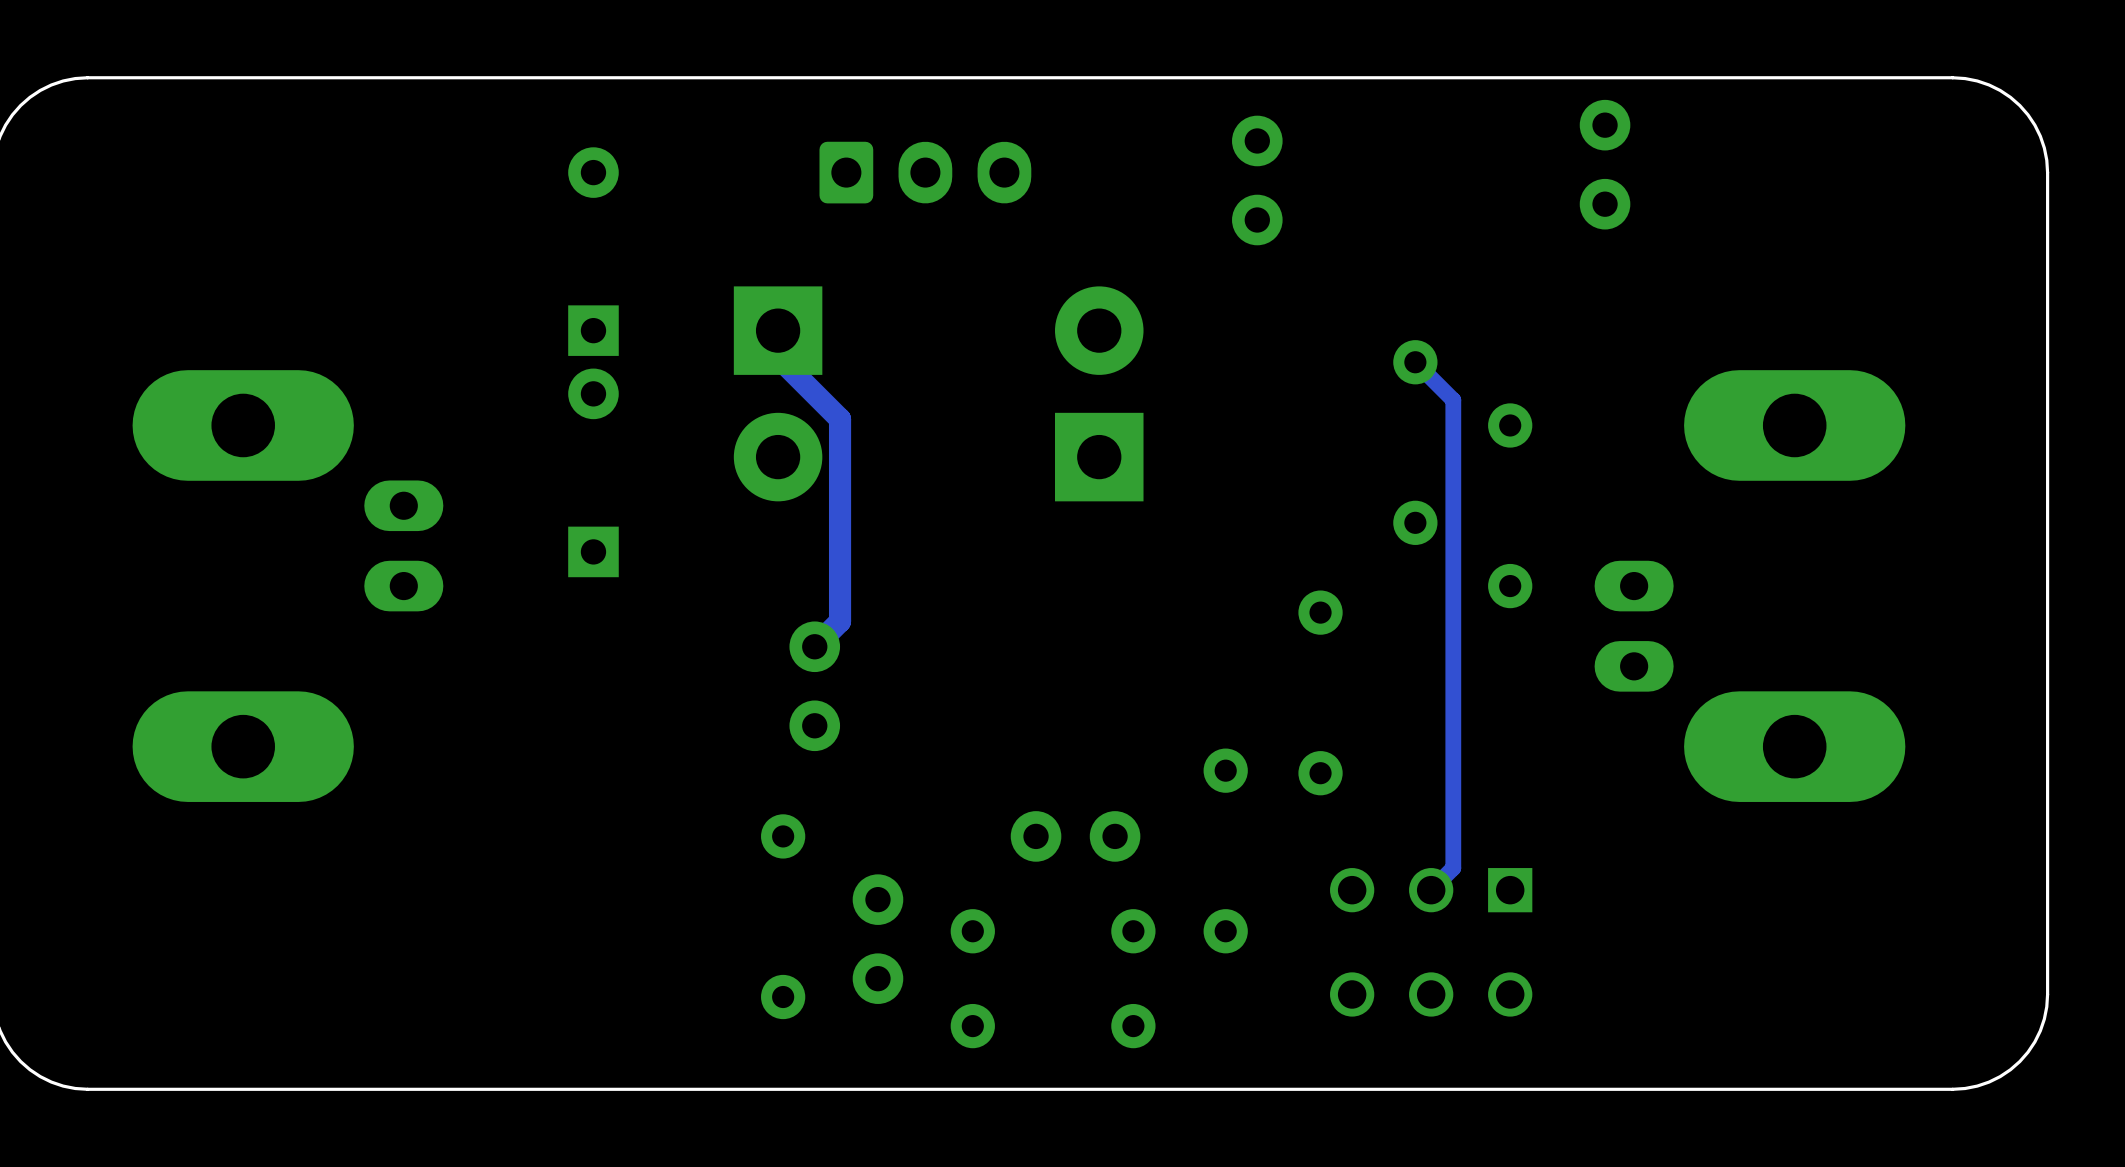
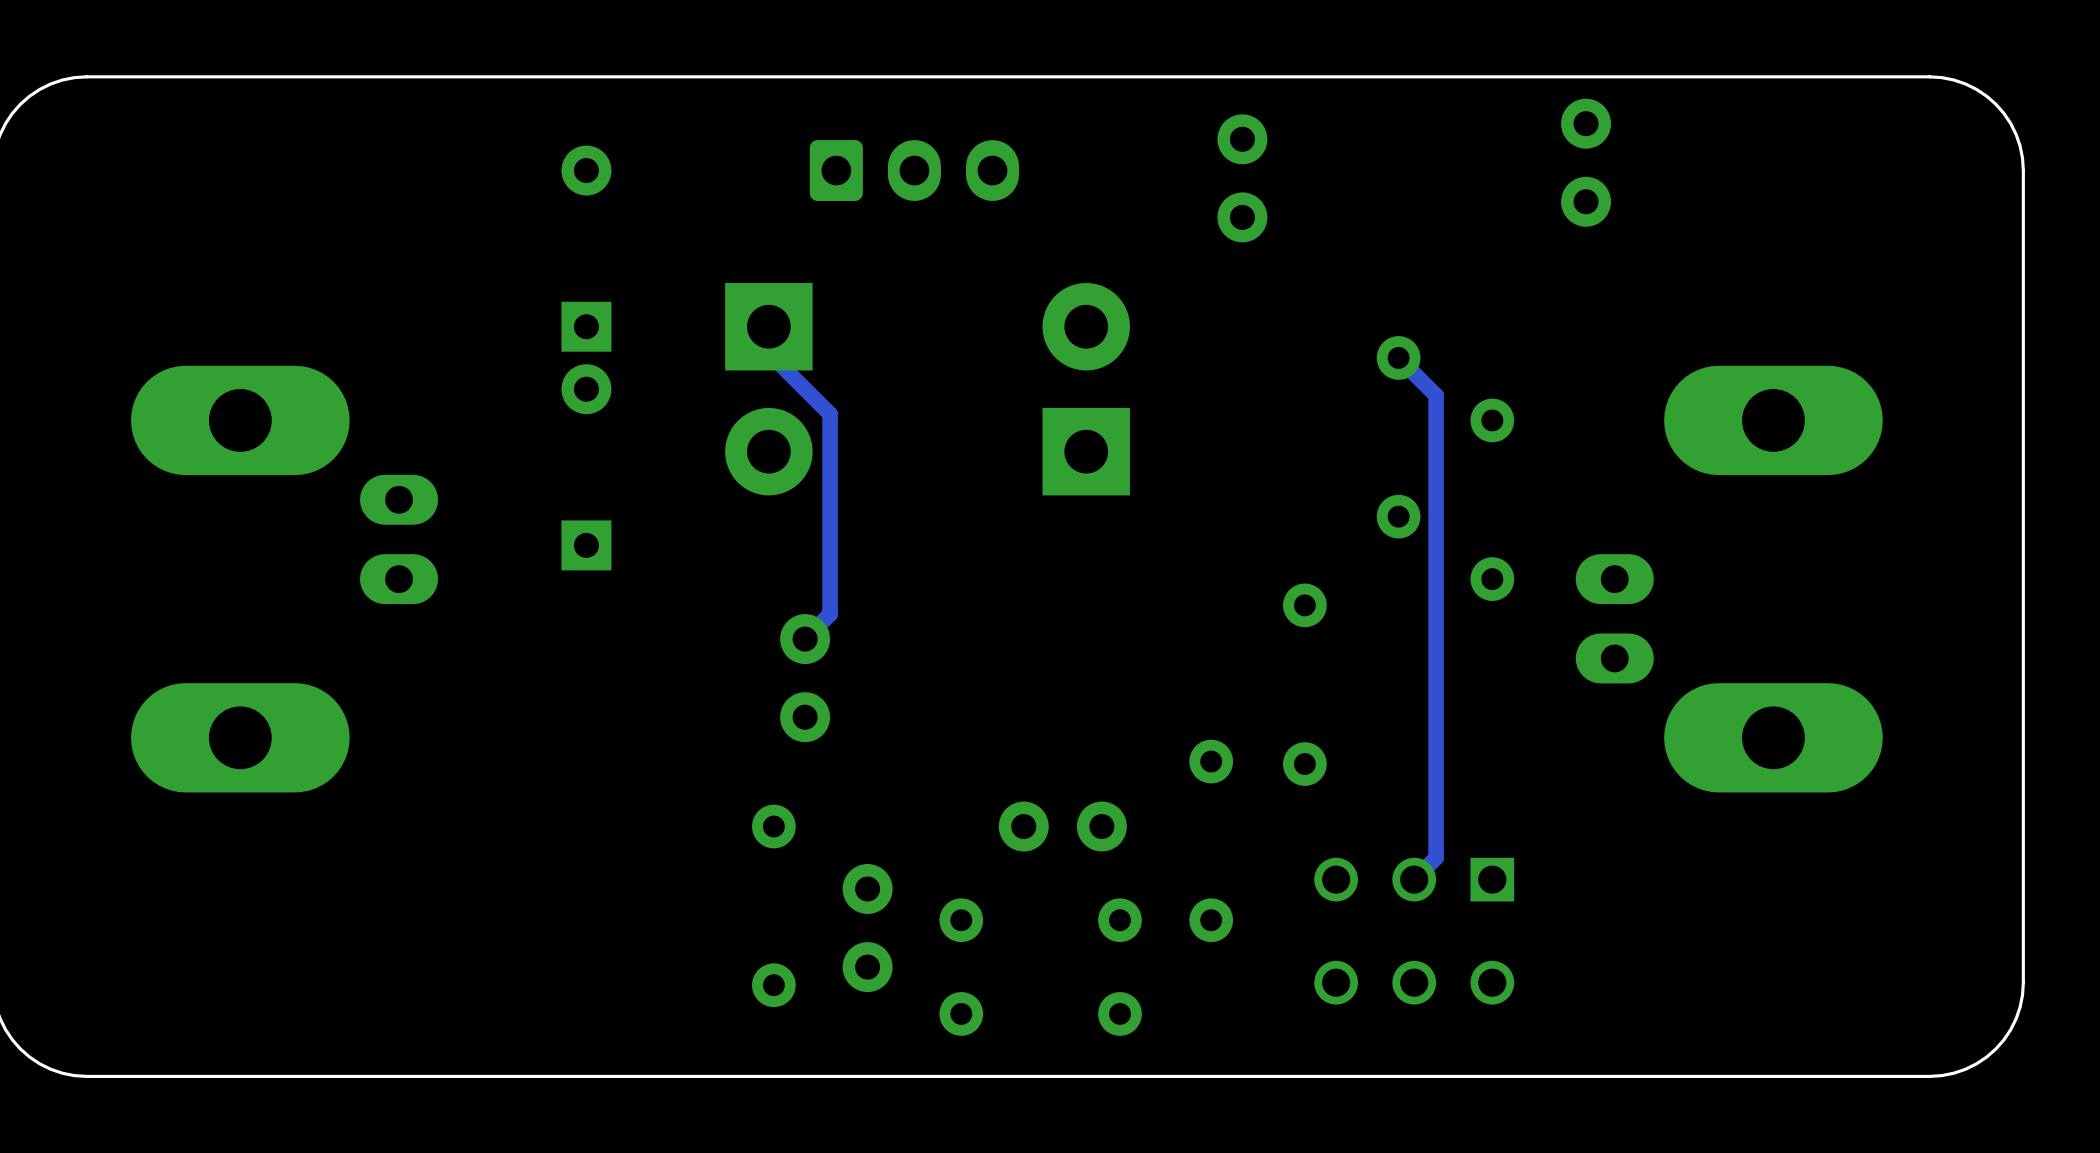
track width: thick (778, 330) (778, 357) (840, 419) (840, 621) (814, 646) -> thin (768, 326) (768, 352) (830, 414) (830, 614) (805, 639)

